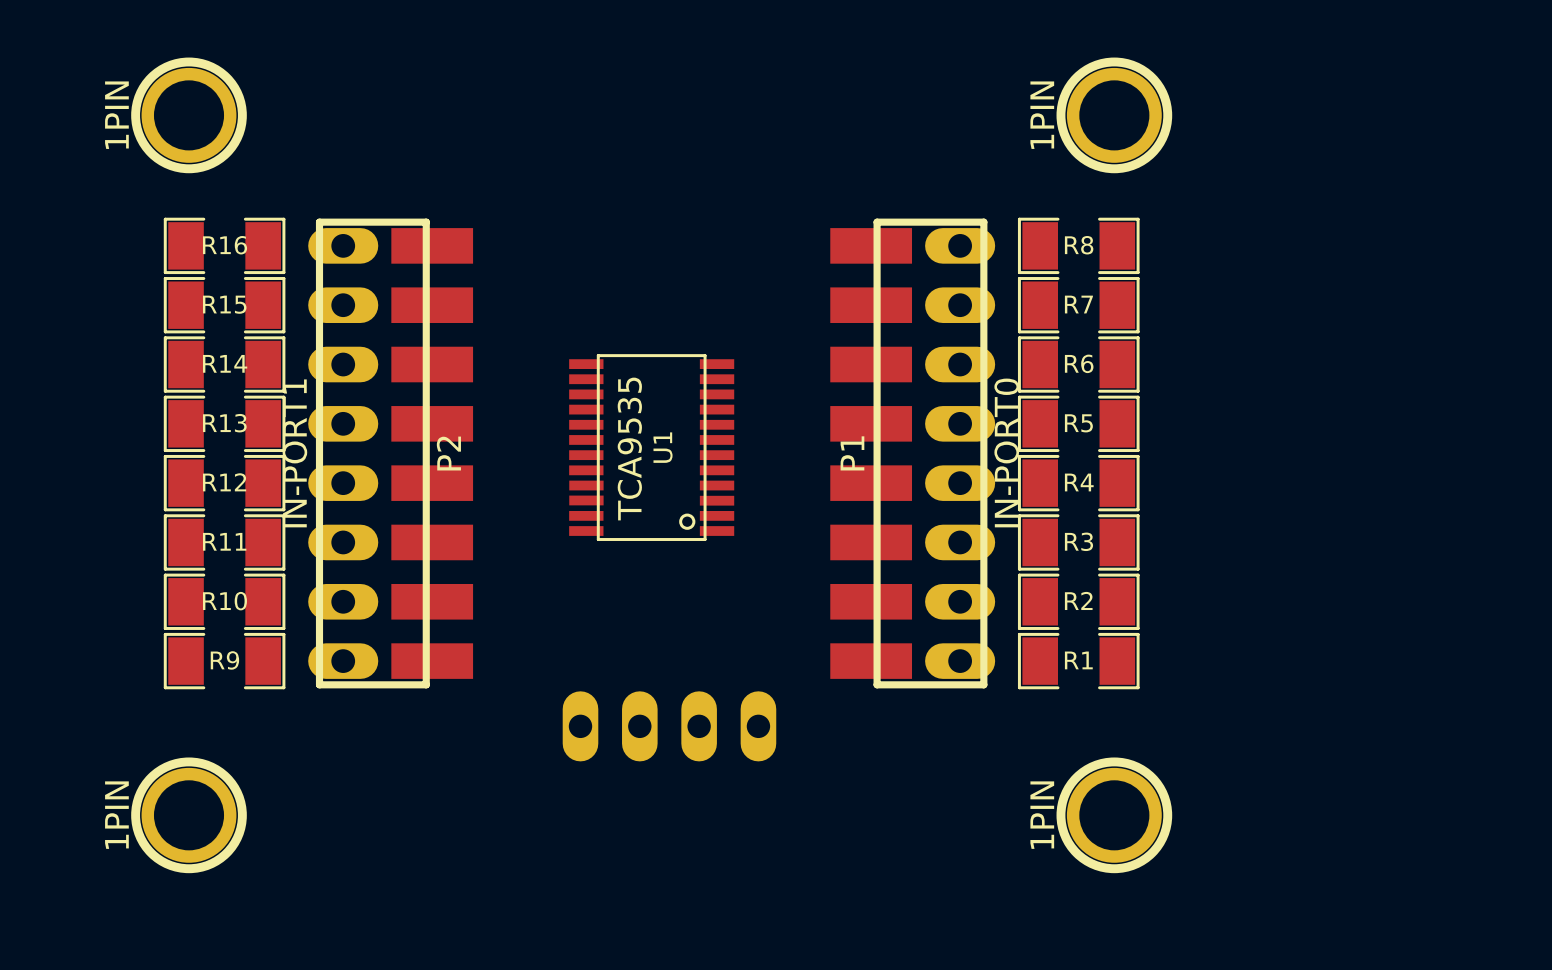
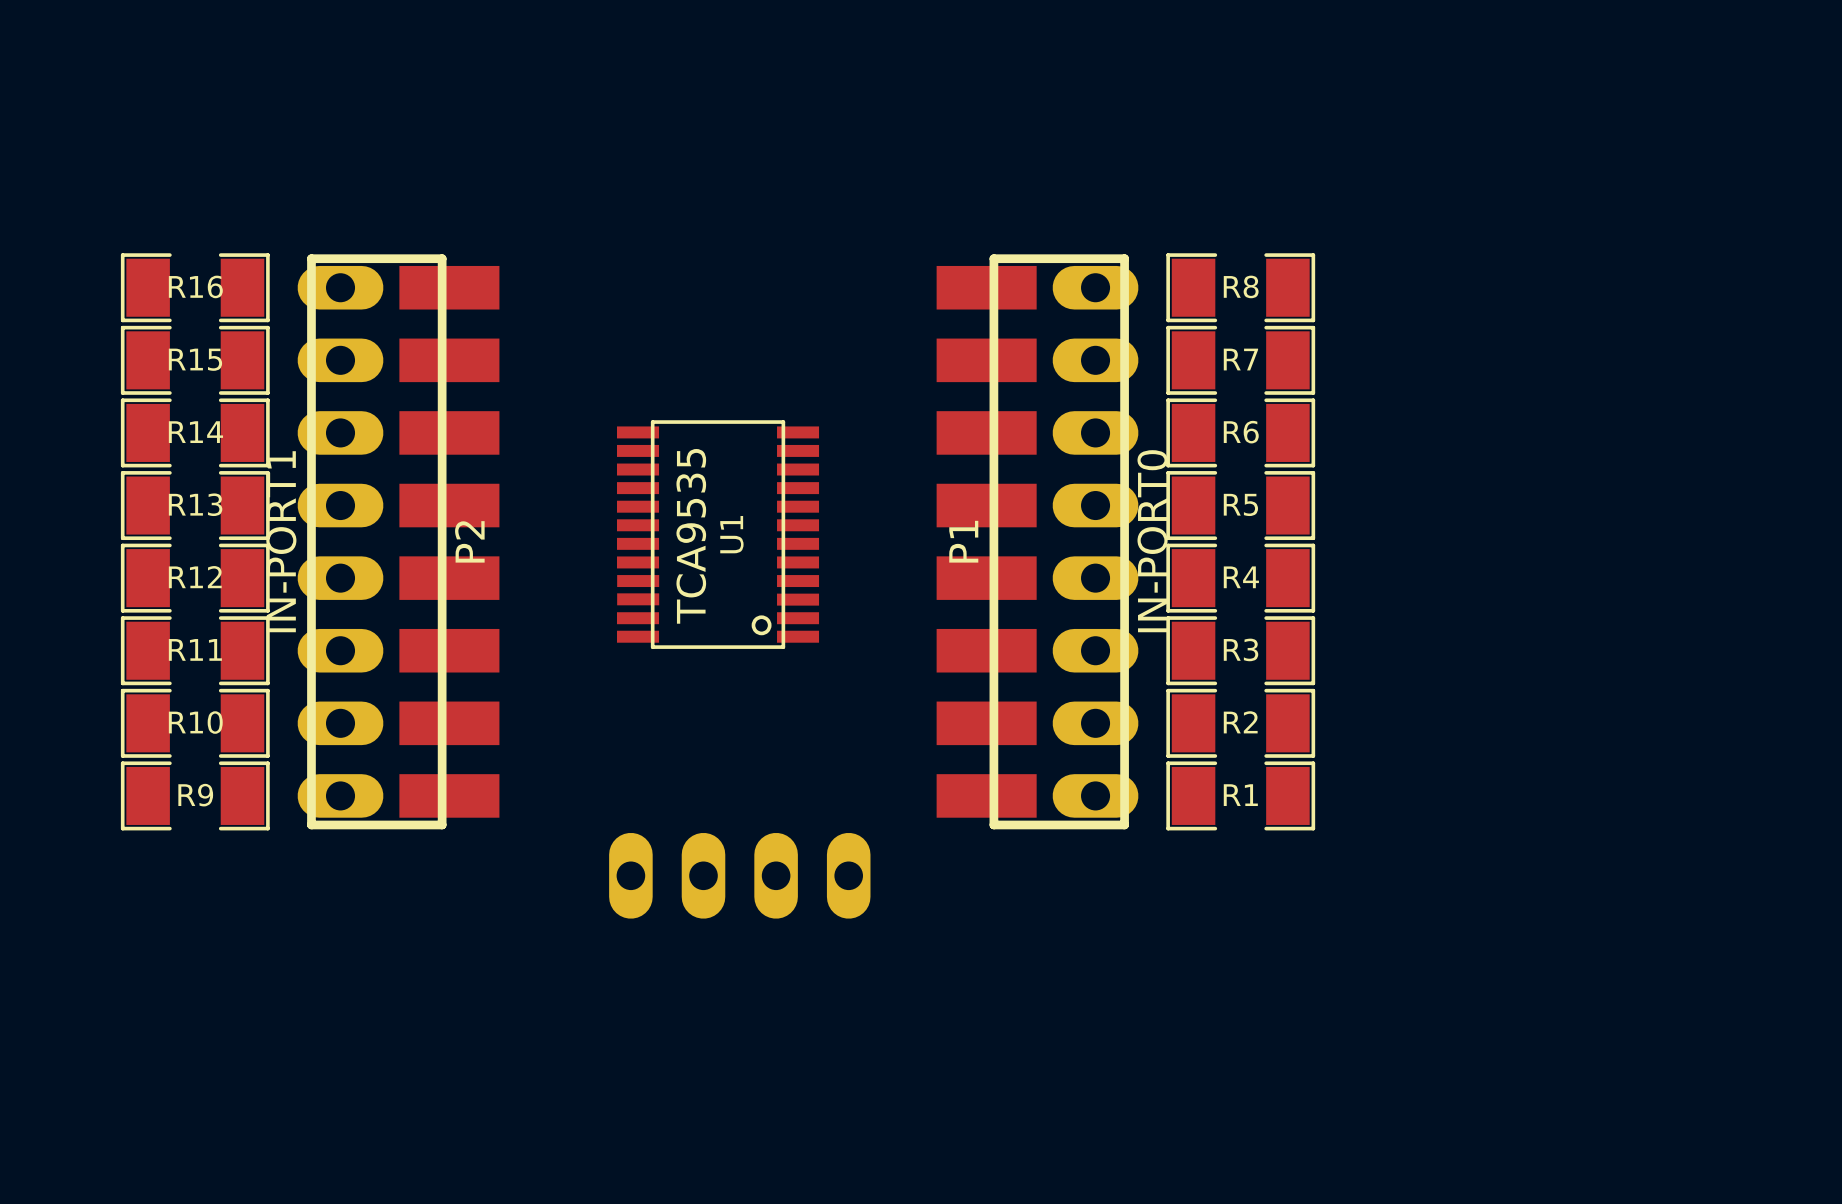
1PIN: (189, 115) -> none
1PIN: (1114, 115) -> none
1PIN: (189, 815) -> none
1PIN: (1114, 815) -> none

